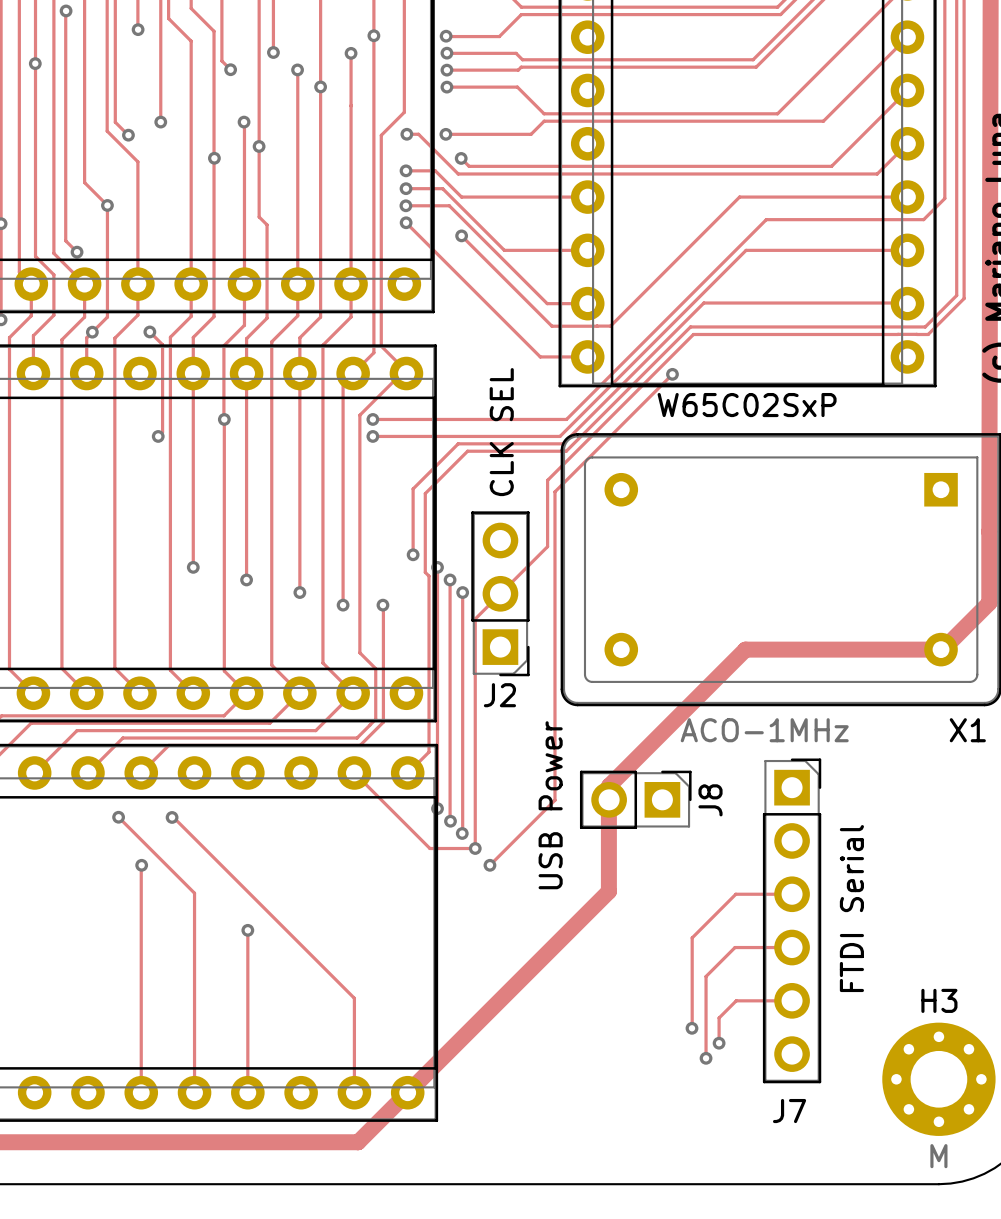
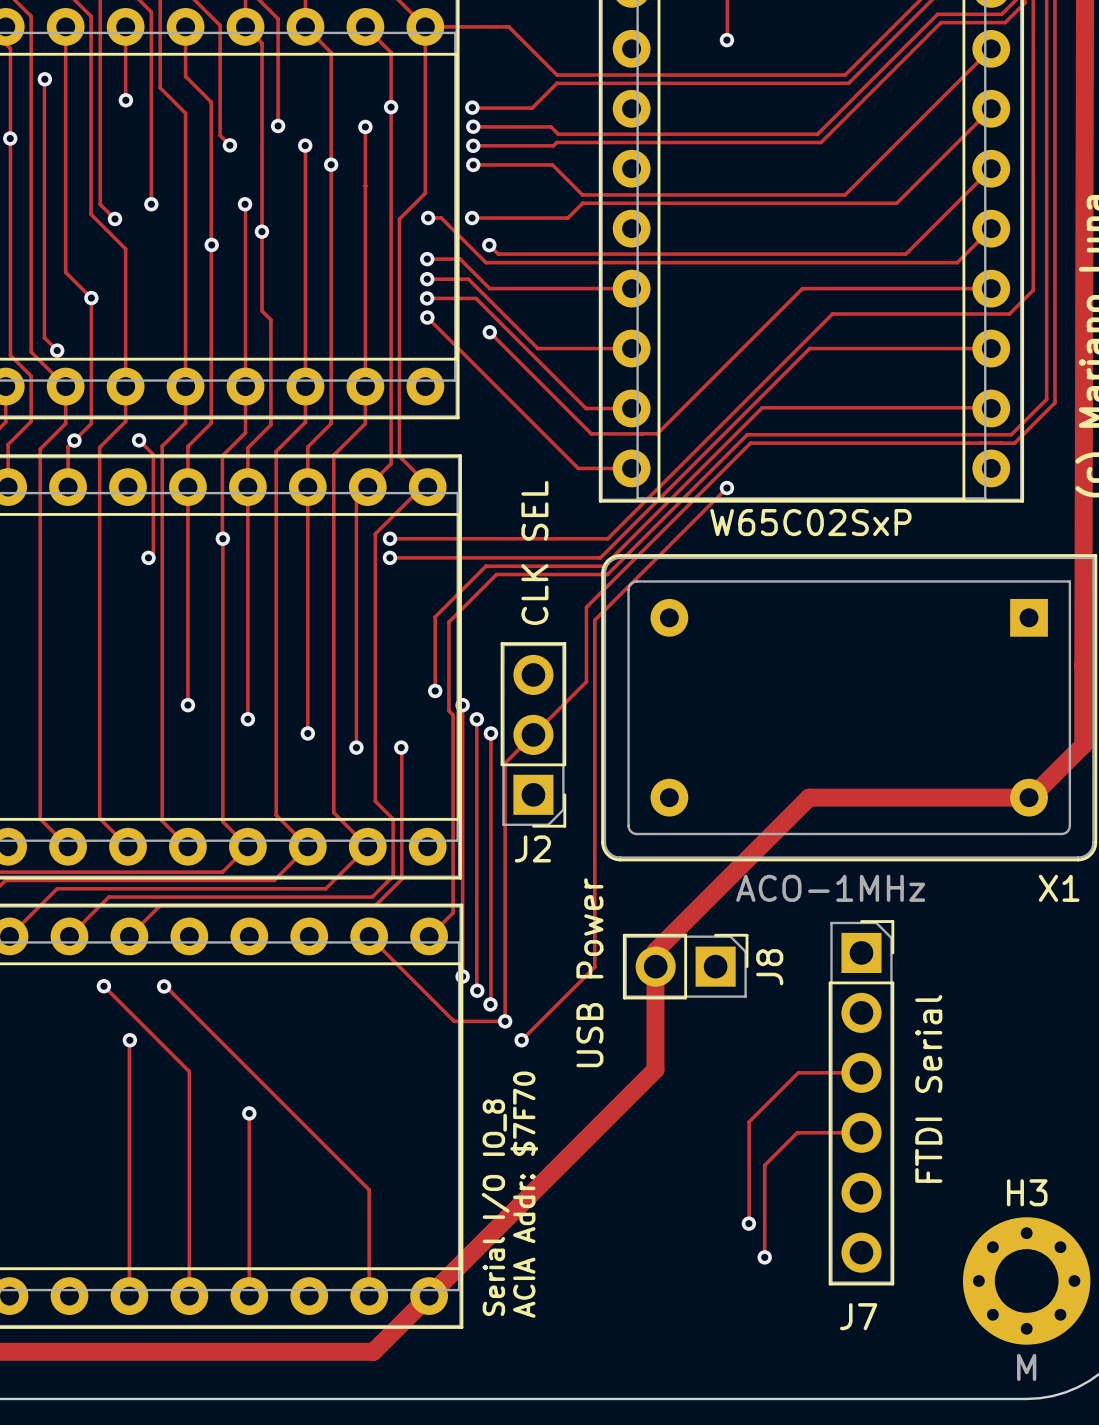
track: (792, 1000) (736, 1000) (719, 1017) (719, 1043) -> none
text: none -> ACIA Addr: $7F70 (524, 1194)
text: none -> Serial I/O IO_8 (495, 1207)
via: (719, 1043) -> none

